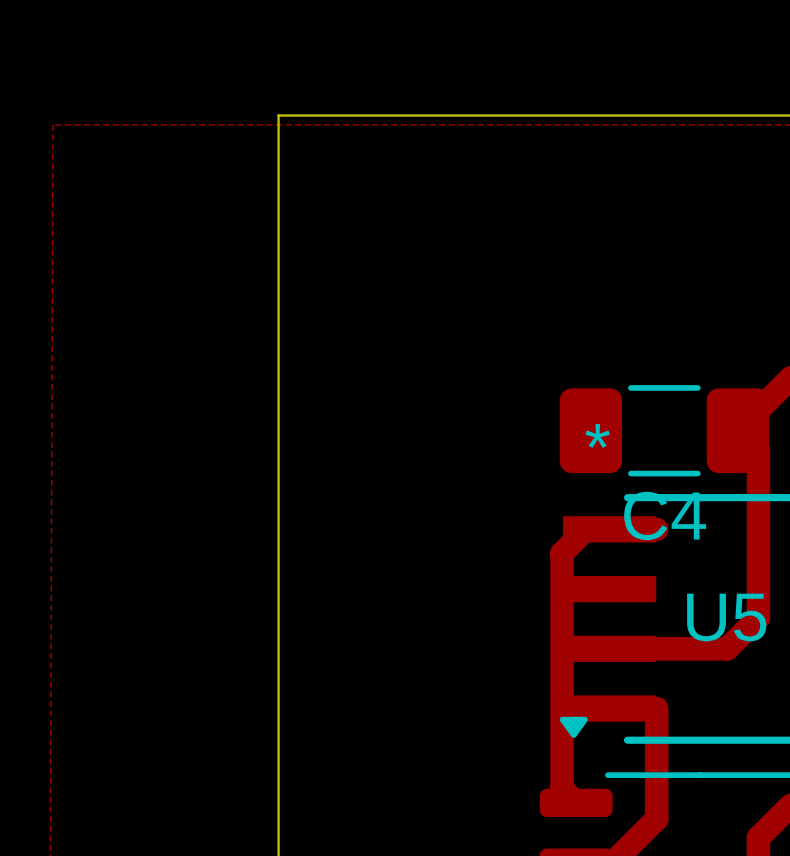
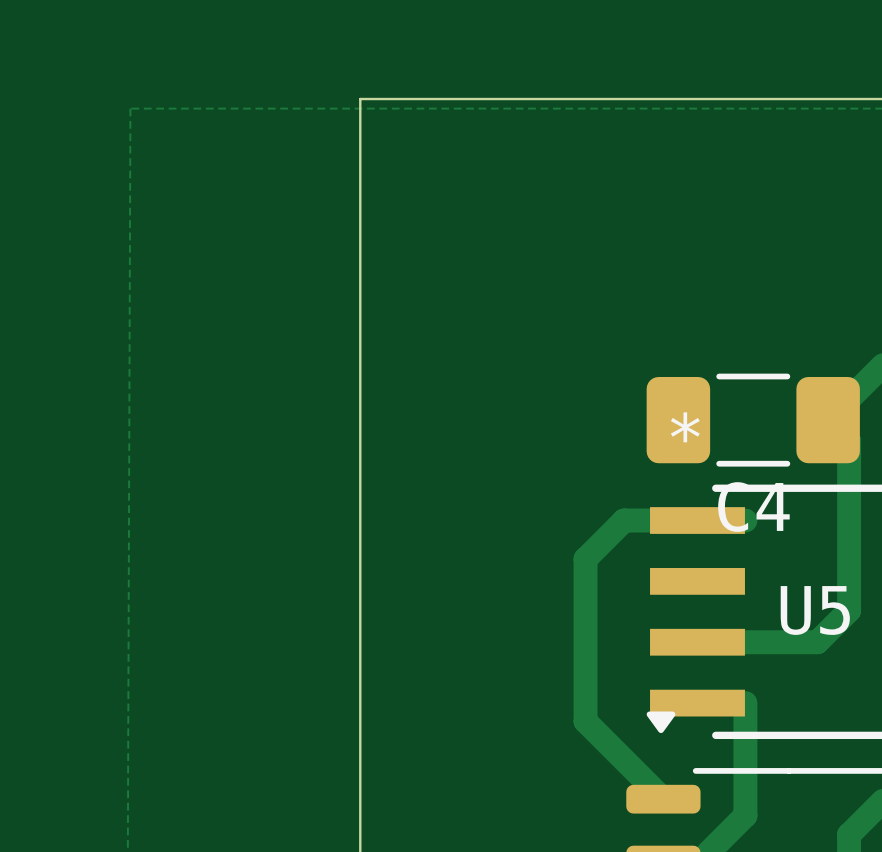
track: (586, 529) (562, 553) (562, 788) -> (673, 520) (624, 520) (585, 559) (585, 721) (649, 784)

